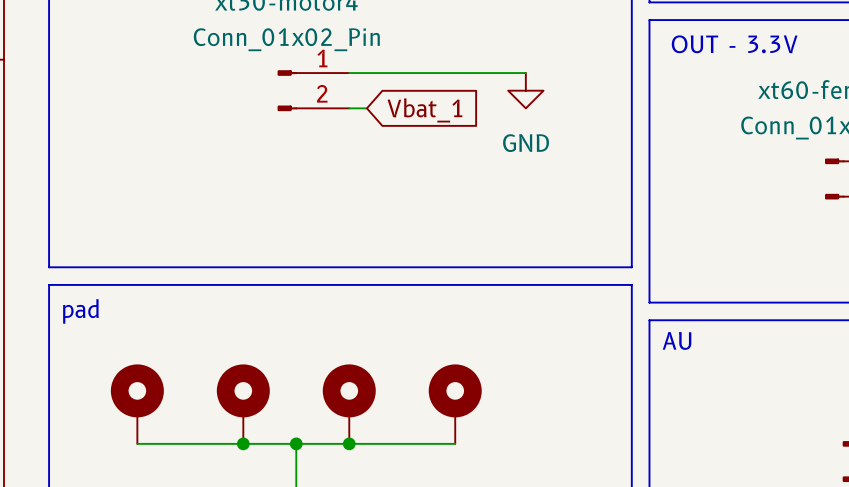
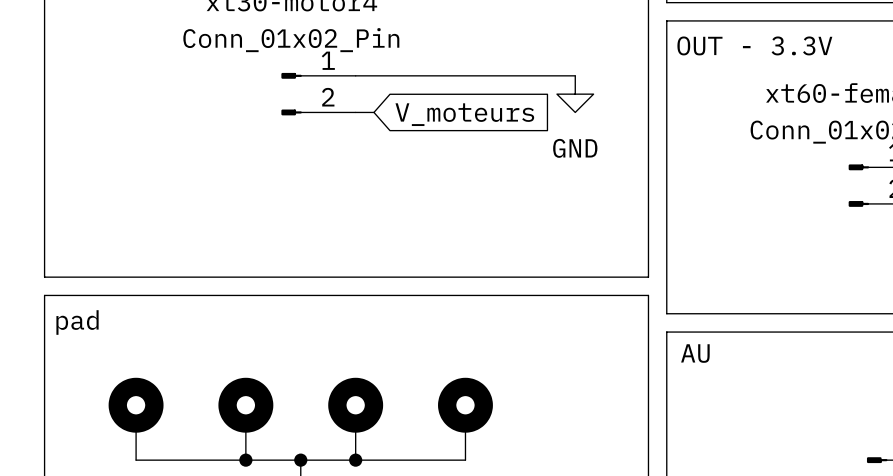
wire: none -> (538, 75) (575, 75)
power symbol position: GND (525, 90) -> GND (575, 94)
global label: Vbat_1 (424, 110) -> V_moteurs (464, 114)

